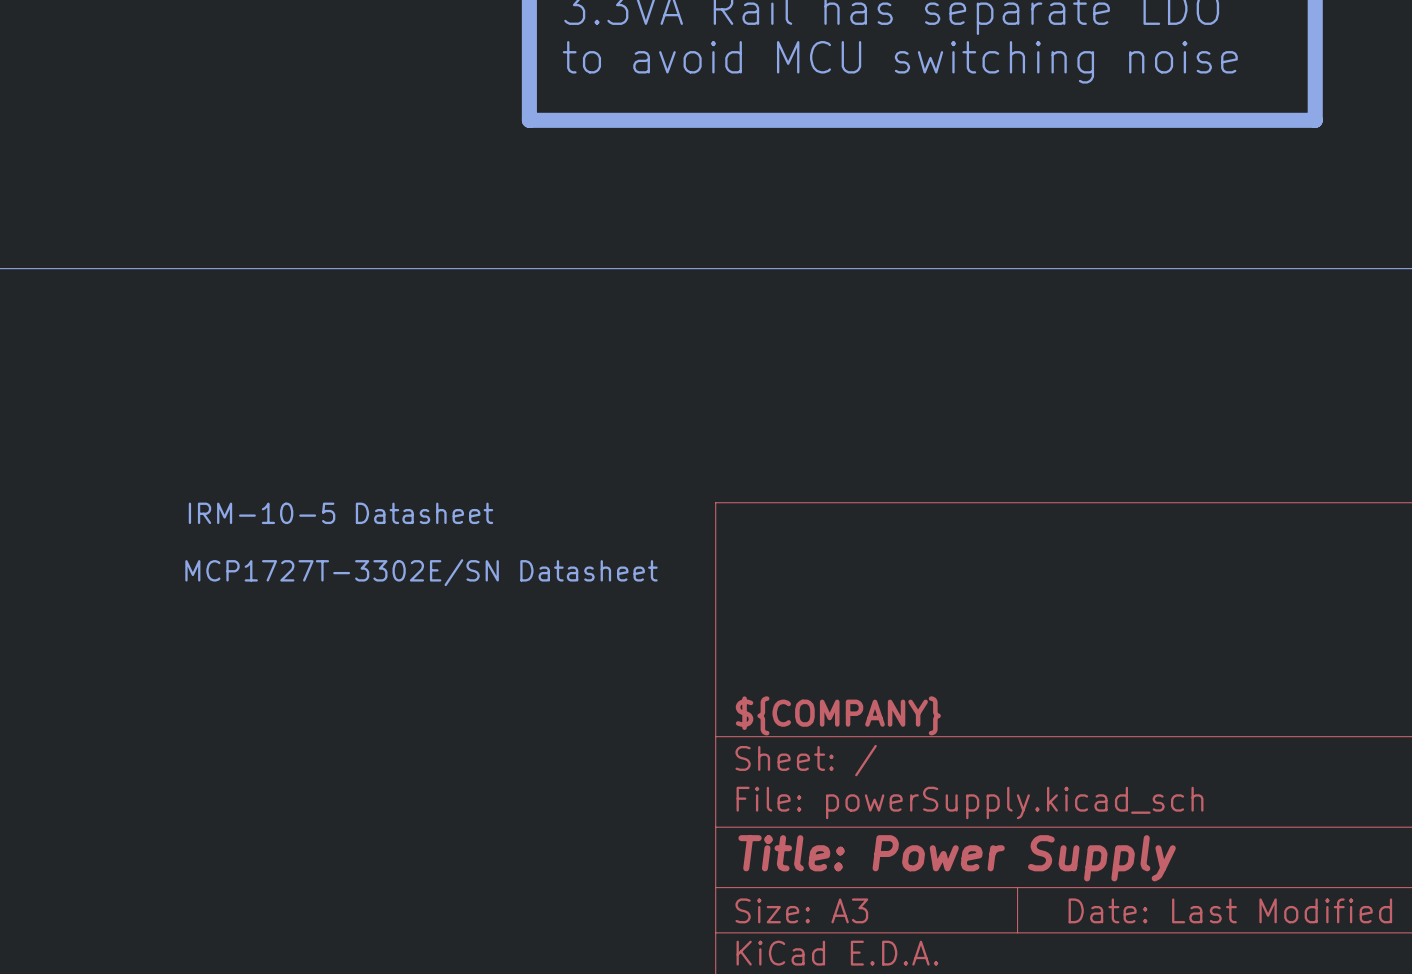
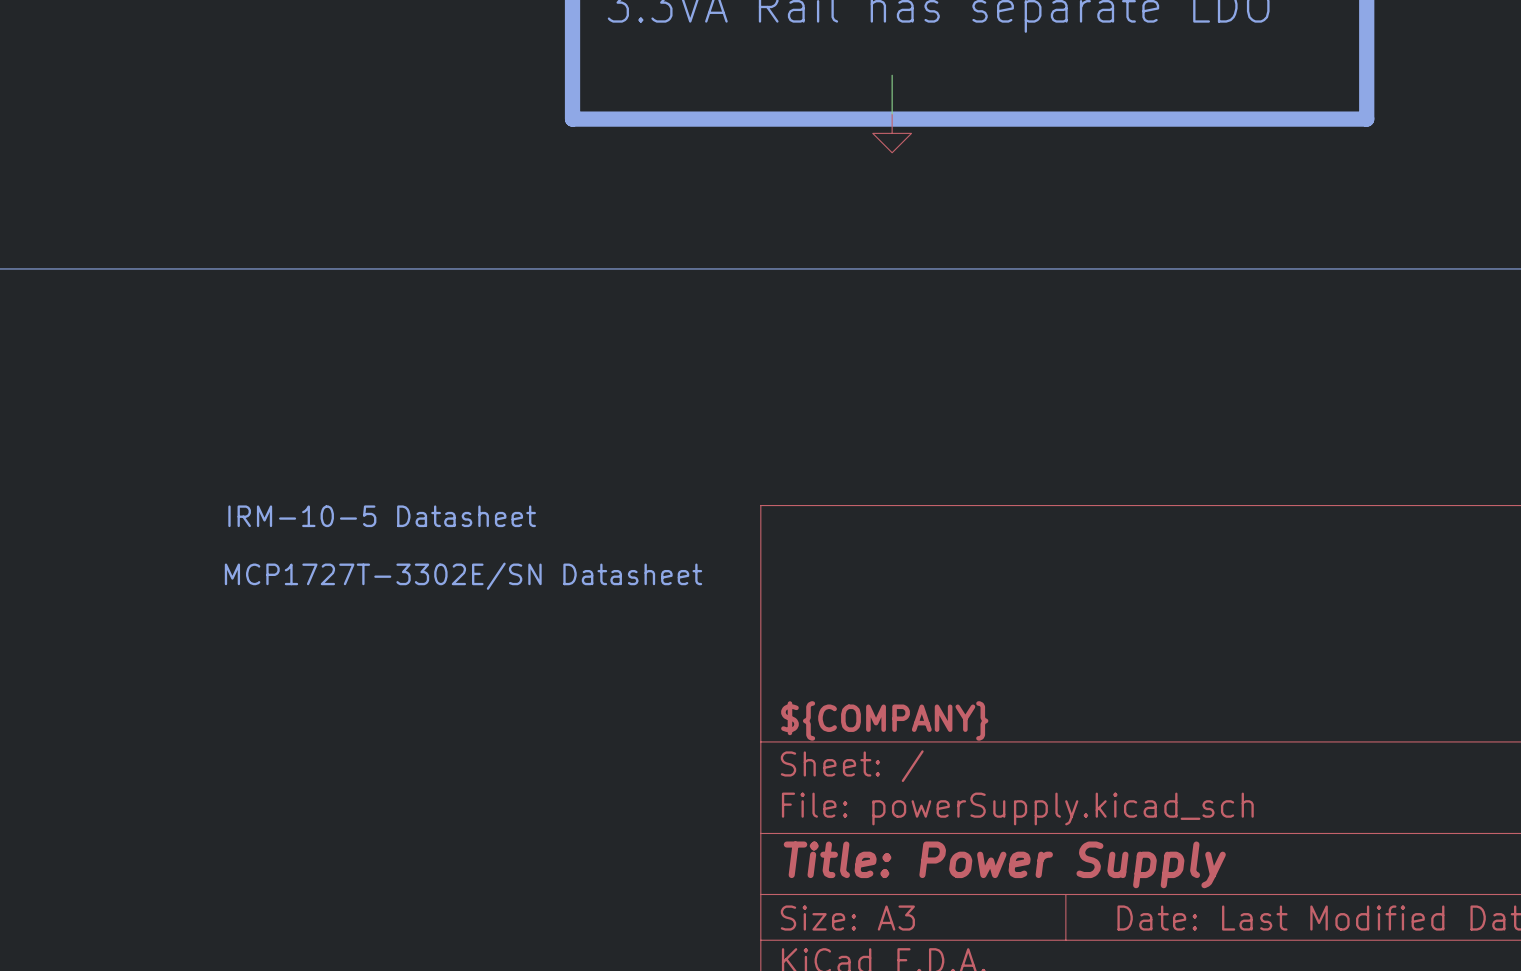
text: to avoid MCU switching noise (900, 62) -> none
wire: none -> (892, 75) (892, 114)
power symbol: none -> (892, 133)

